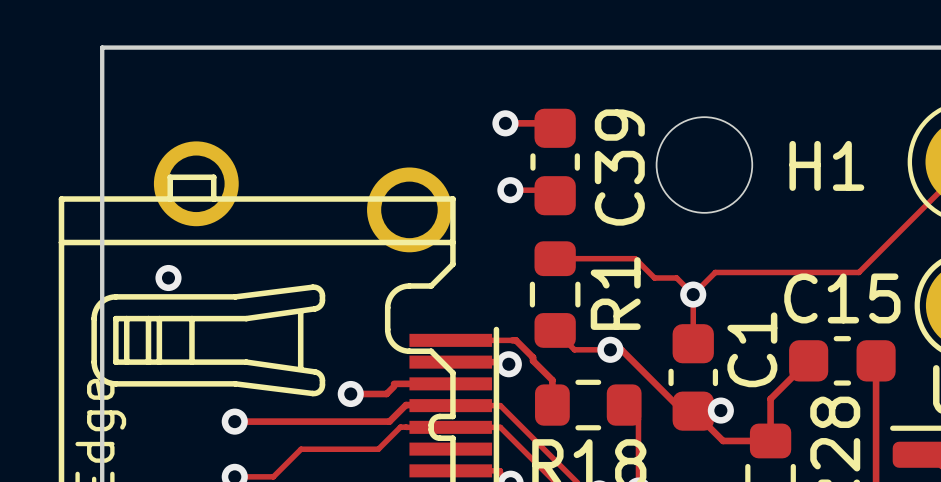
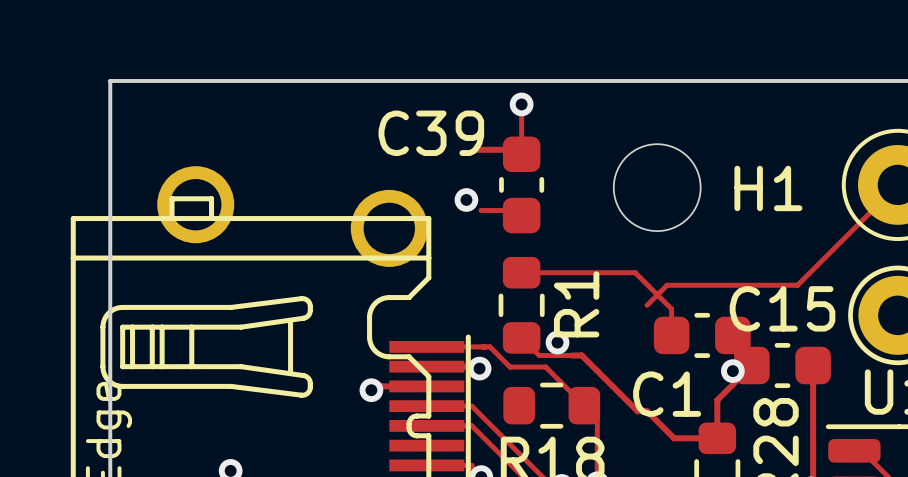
track: none -> (521, 104) (521, 139)
via: none -> (521, 104)
via: (505, 123) -> none
C39 name rotation: 0° (619, 167) -> 90° clockwise (431, 133)
C39 name position: C39 (619, 167) -> C39 (431, 133)
via position: (510, 190) -> (466, 199)
track: (635, 258) (654, 278) (676, 278) (693, 294) (693, 343) -> (594, 272) (635, 272) (671, 309) (671, 335)
via: (168, 278) -> none
via: (693, 294) -> none
track: (515, 340) (552, 380) (552, 405) -> (485, 346) (489, 346) (510, 367) (545, 367) (584, 405)
via position: (610, 349) -> (557, 342)
via: none -> (732, 371)
C1 rotation: 0° (693, 377) -> 90° clockwise (702, 335)
C1 position: (693, 377) -> (702, 335)
track: (394, 386) (386, 394) (350, 394) -> none
via position: (350, 394) -> (371, 390)
track: (450, 405) (406, 405) (389, 421) (234, 421) -> none
via: (720, 410) -> none
via: (234, 421) -> none
track: (450, 427) (400, 427) (378, 449) (301, 449) (273, 476) (234, 476) -> none

